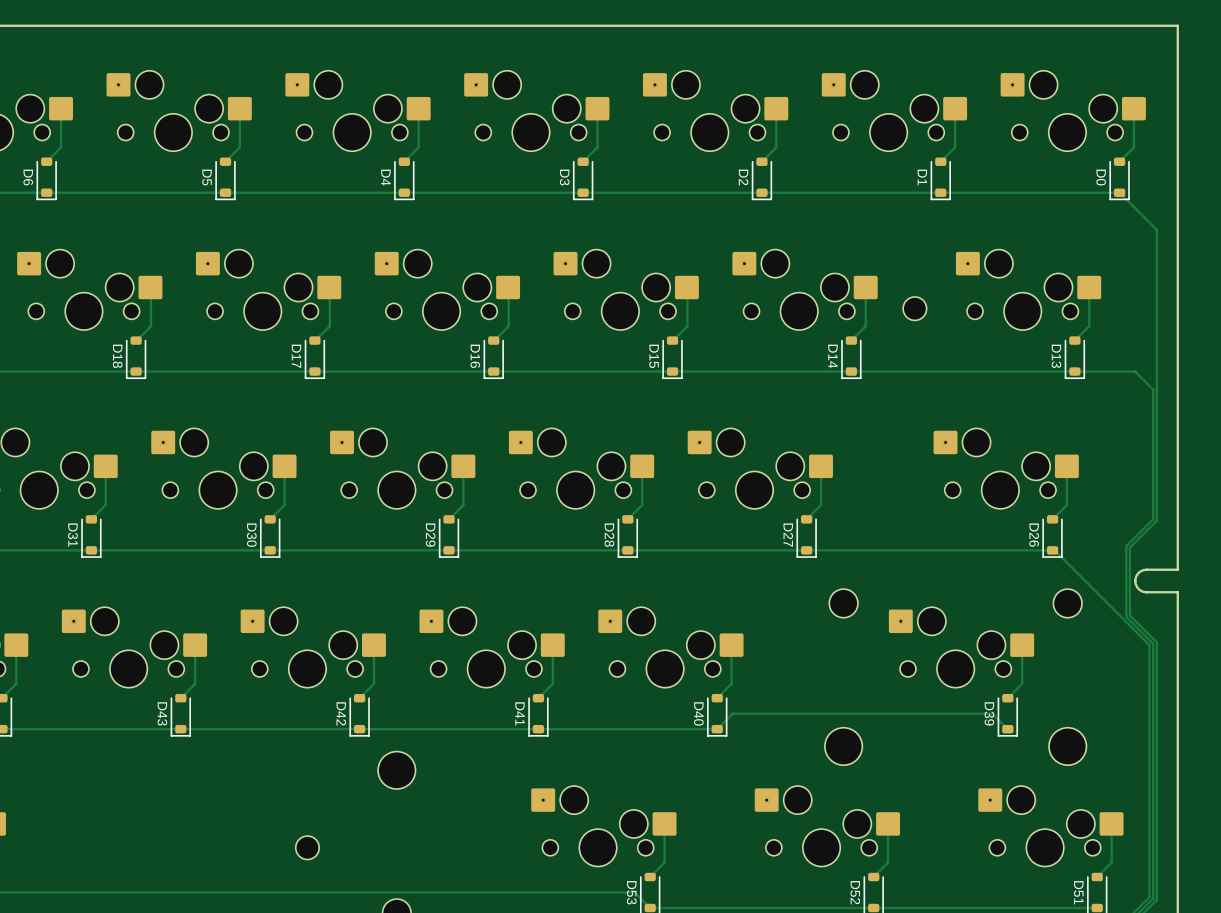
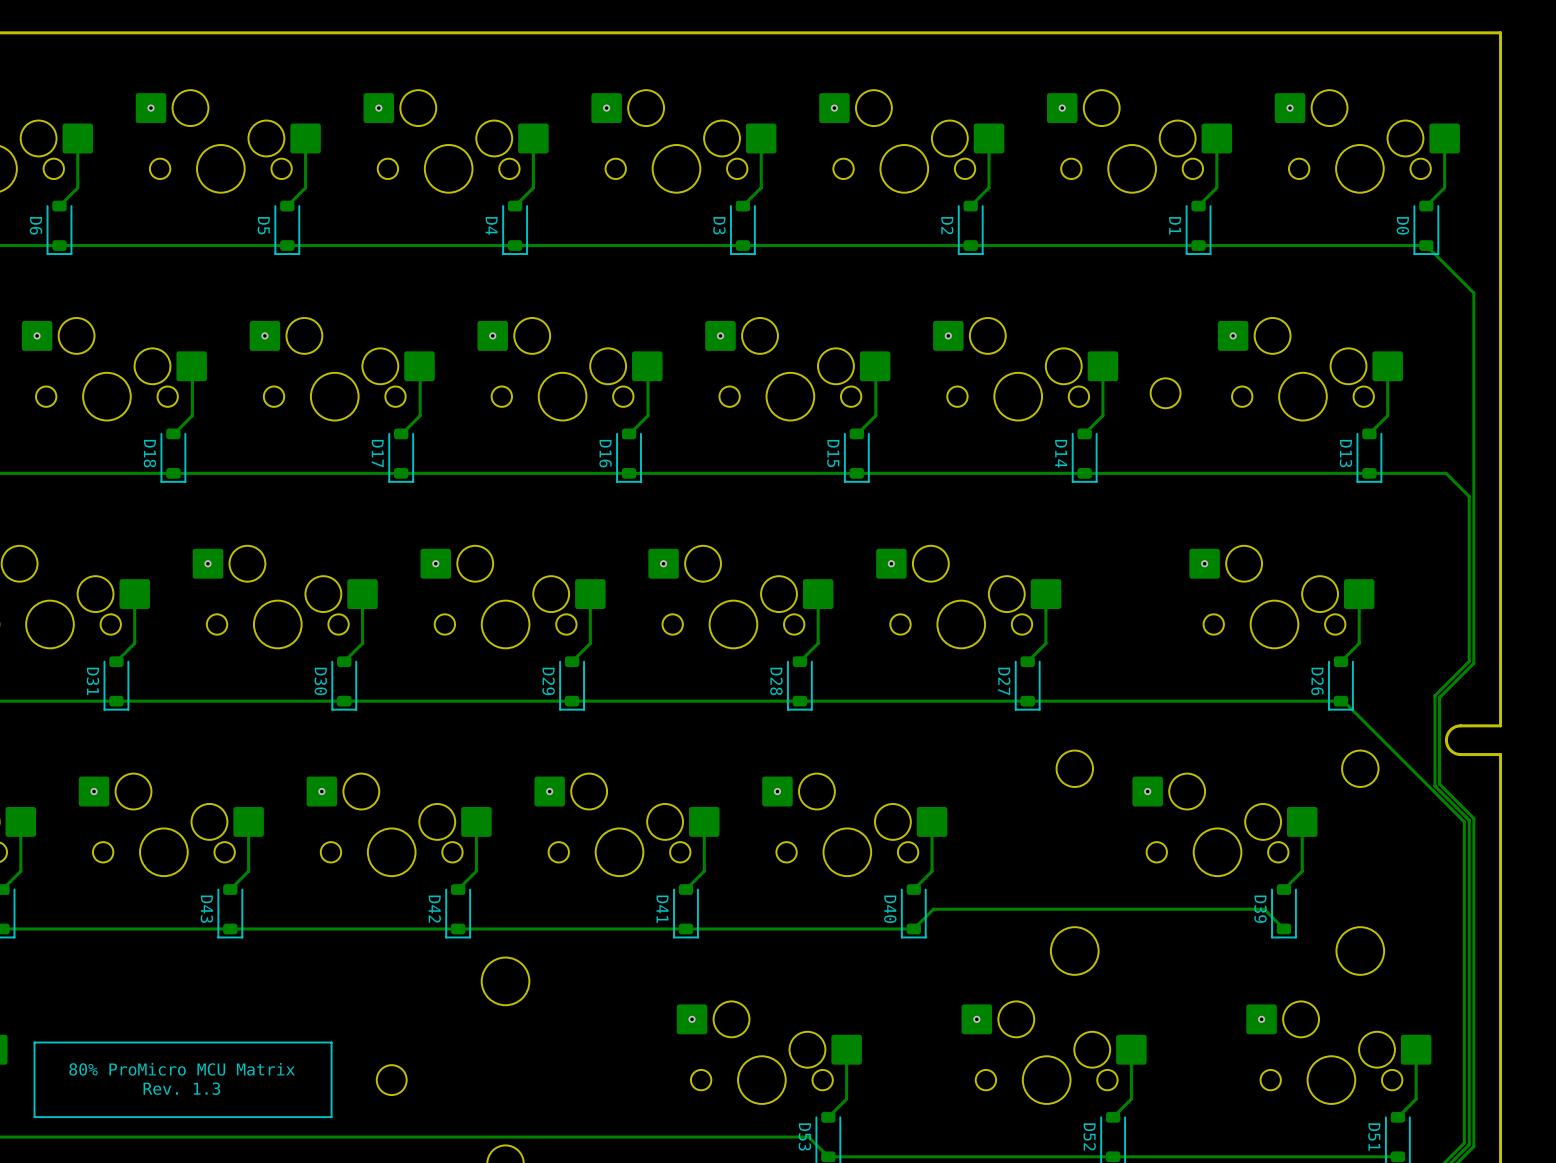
line: none -> (331, 1042) (34, 1042) (34, 1117) (331, 1117) (331, 1042)
text: none -> 80% ProMicro MCU Matrix (182, 1069)
text: none -> Rev. 1.3 (181, 1088)

